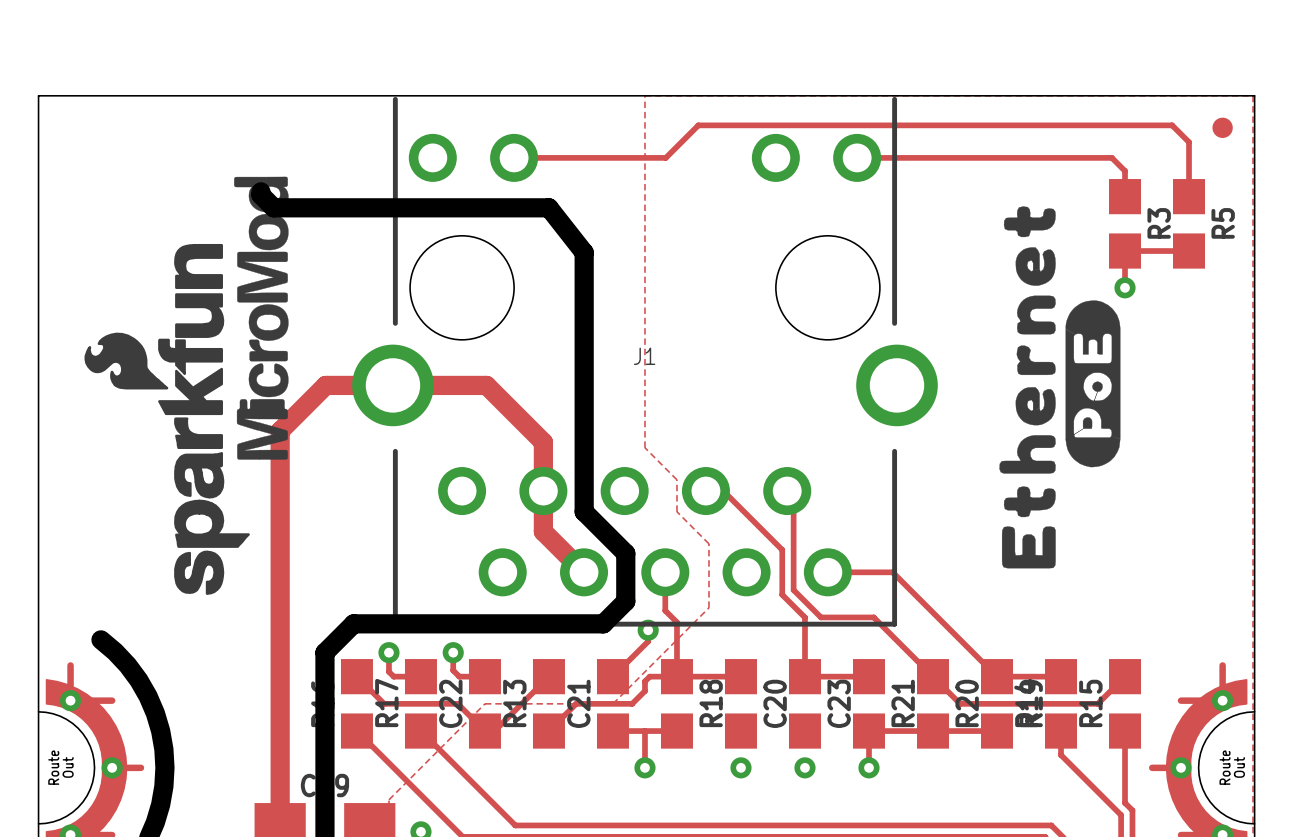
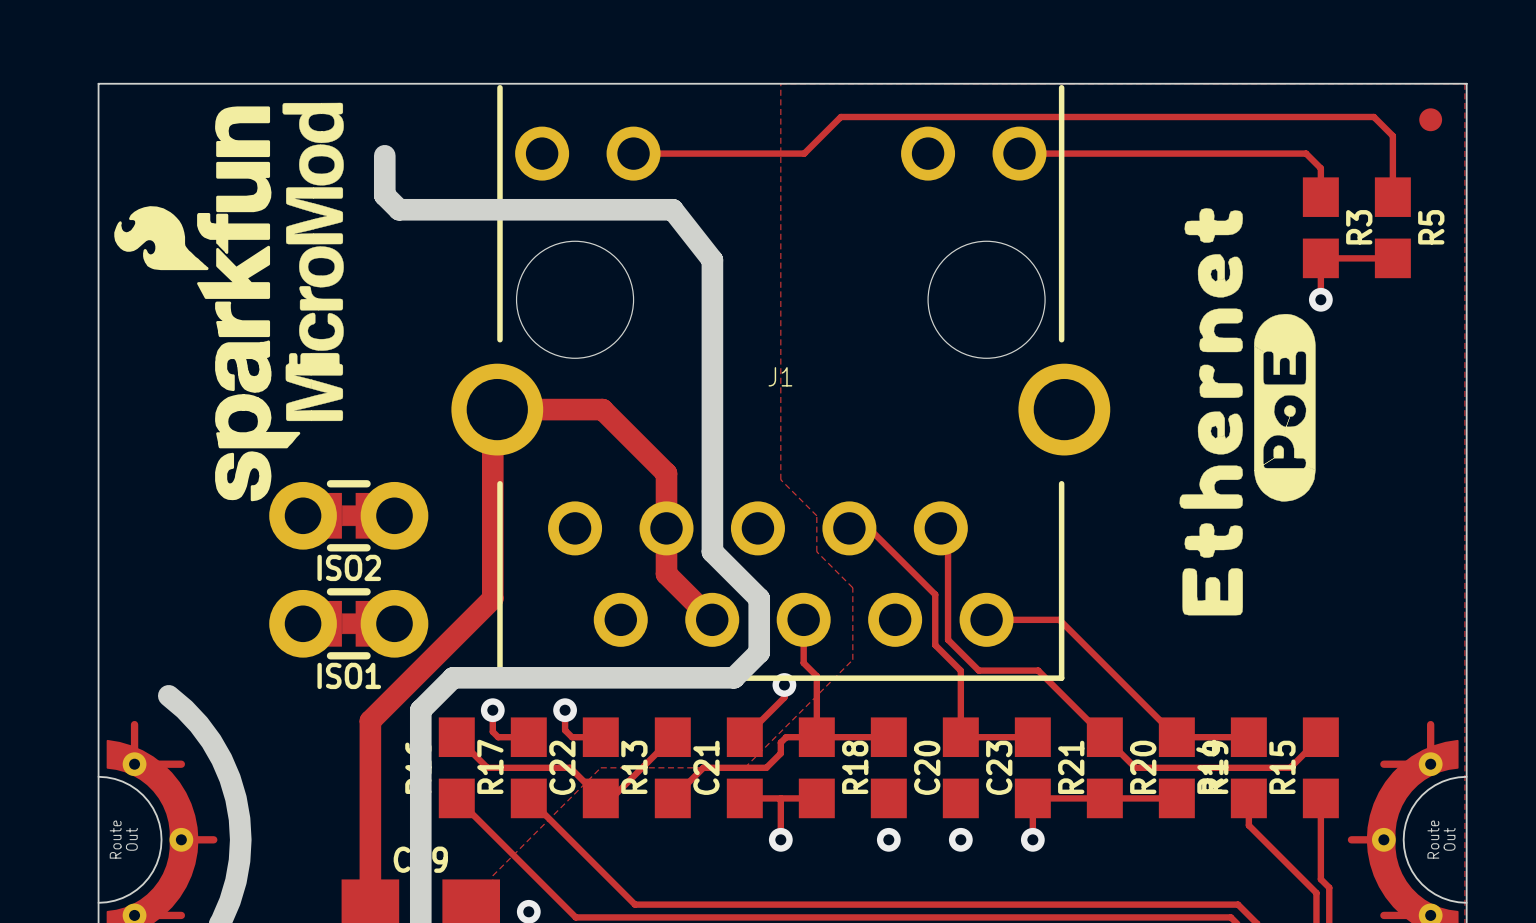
board edge: (260, 191) (260, 195) (273, 207) (305, 207) -> (384, 155) (384, 195) (399, 209)
drawing position: (261, 318) -> (313, 261)
track: (392, 385) (325, 385) (280, 431) (280, 662) -> (497, 409) (492, 407) (492, 598) (370, 721)
drawing position: (167, 419) -> (207, 303)
ISO2: none -> (348, 515)
ISO1: none -> (348, 623)

